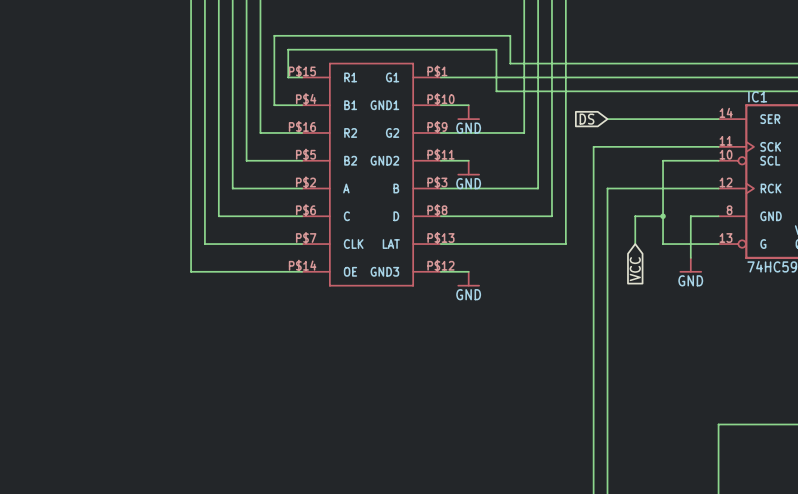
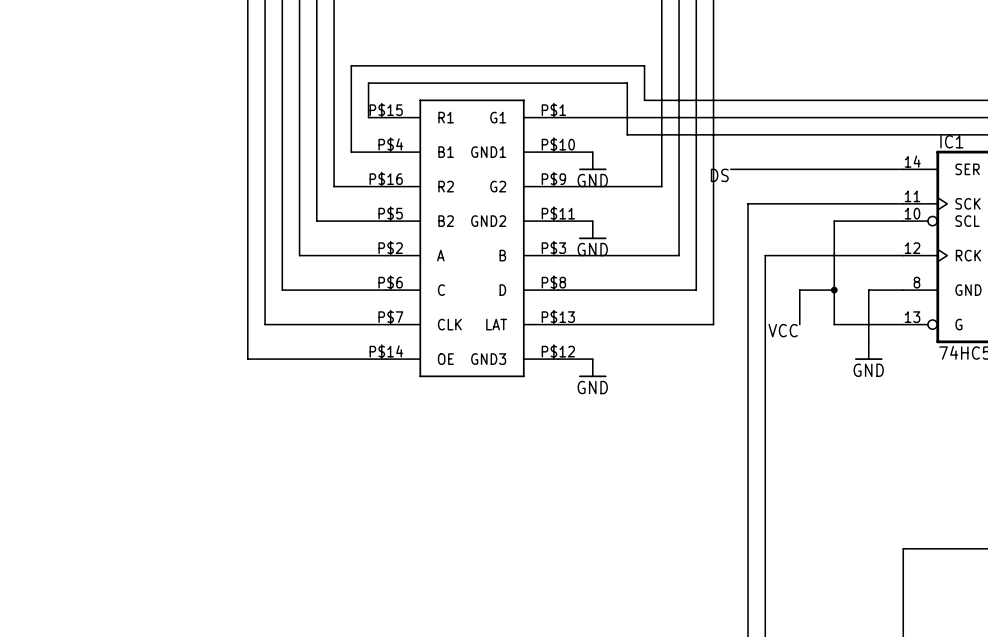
wire: none -> (730, 169) (765, 169)
global label: DS (587, 119) -> none
label: none -> DS (719, 175)
label: none -> VCC (783, 330)
global label: VCC (635, 269) -> none

